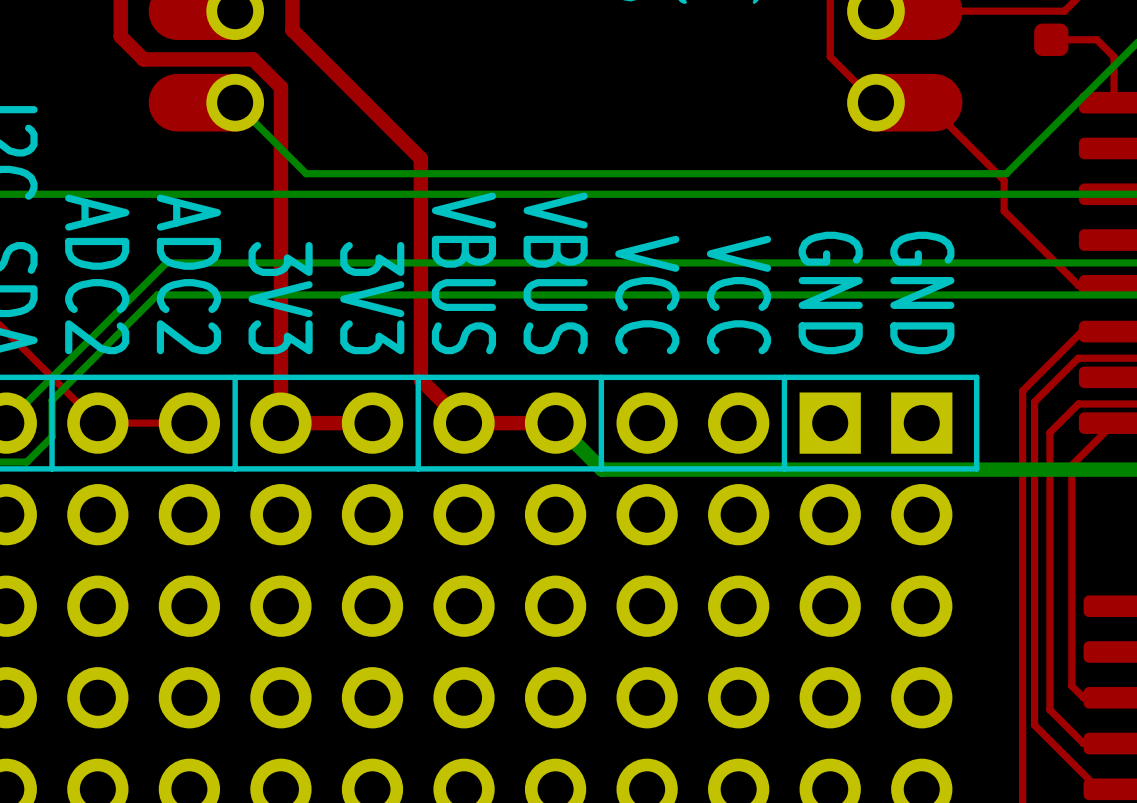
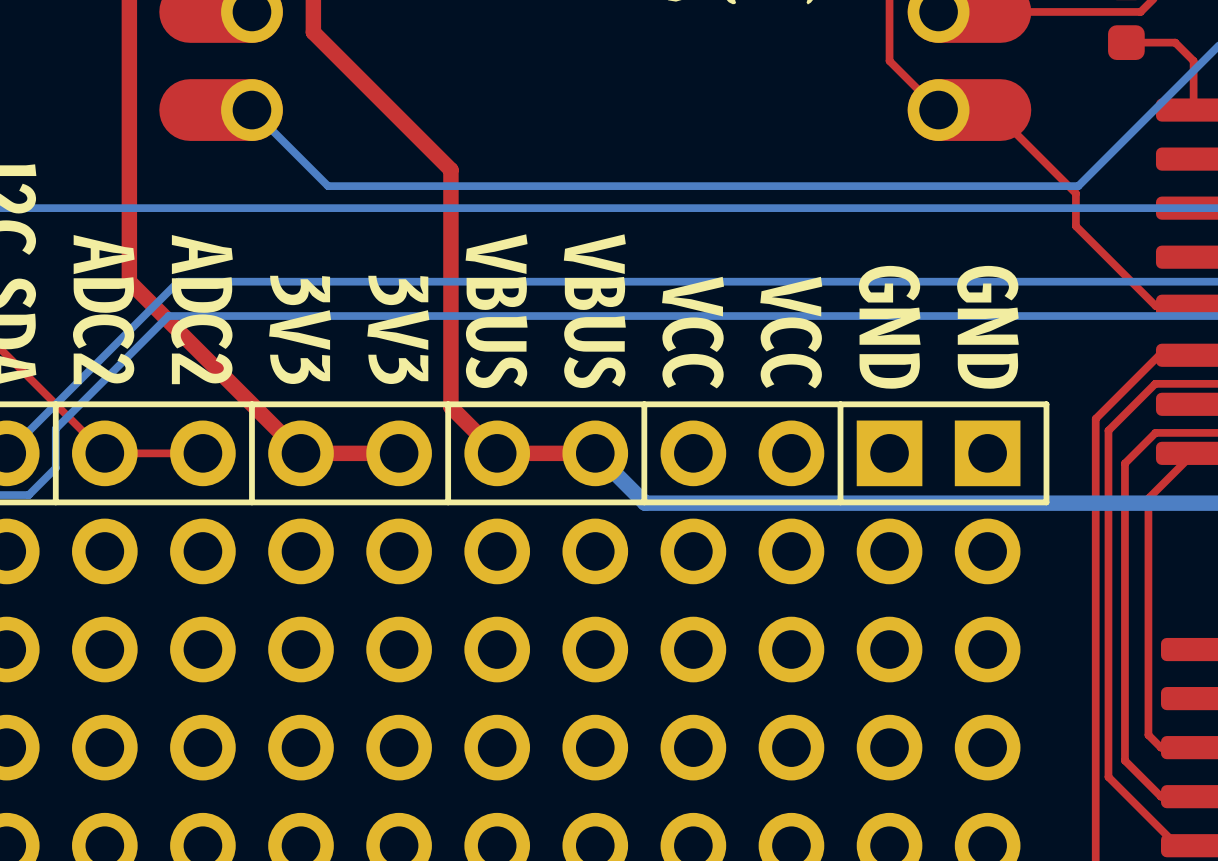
top track: (120, 36) (143, 59) (253, 59) (280, 87) (280, 423) -> (129, 39) (129, 281) (301, 453)

